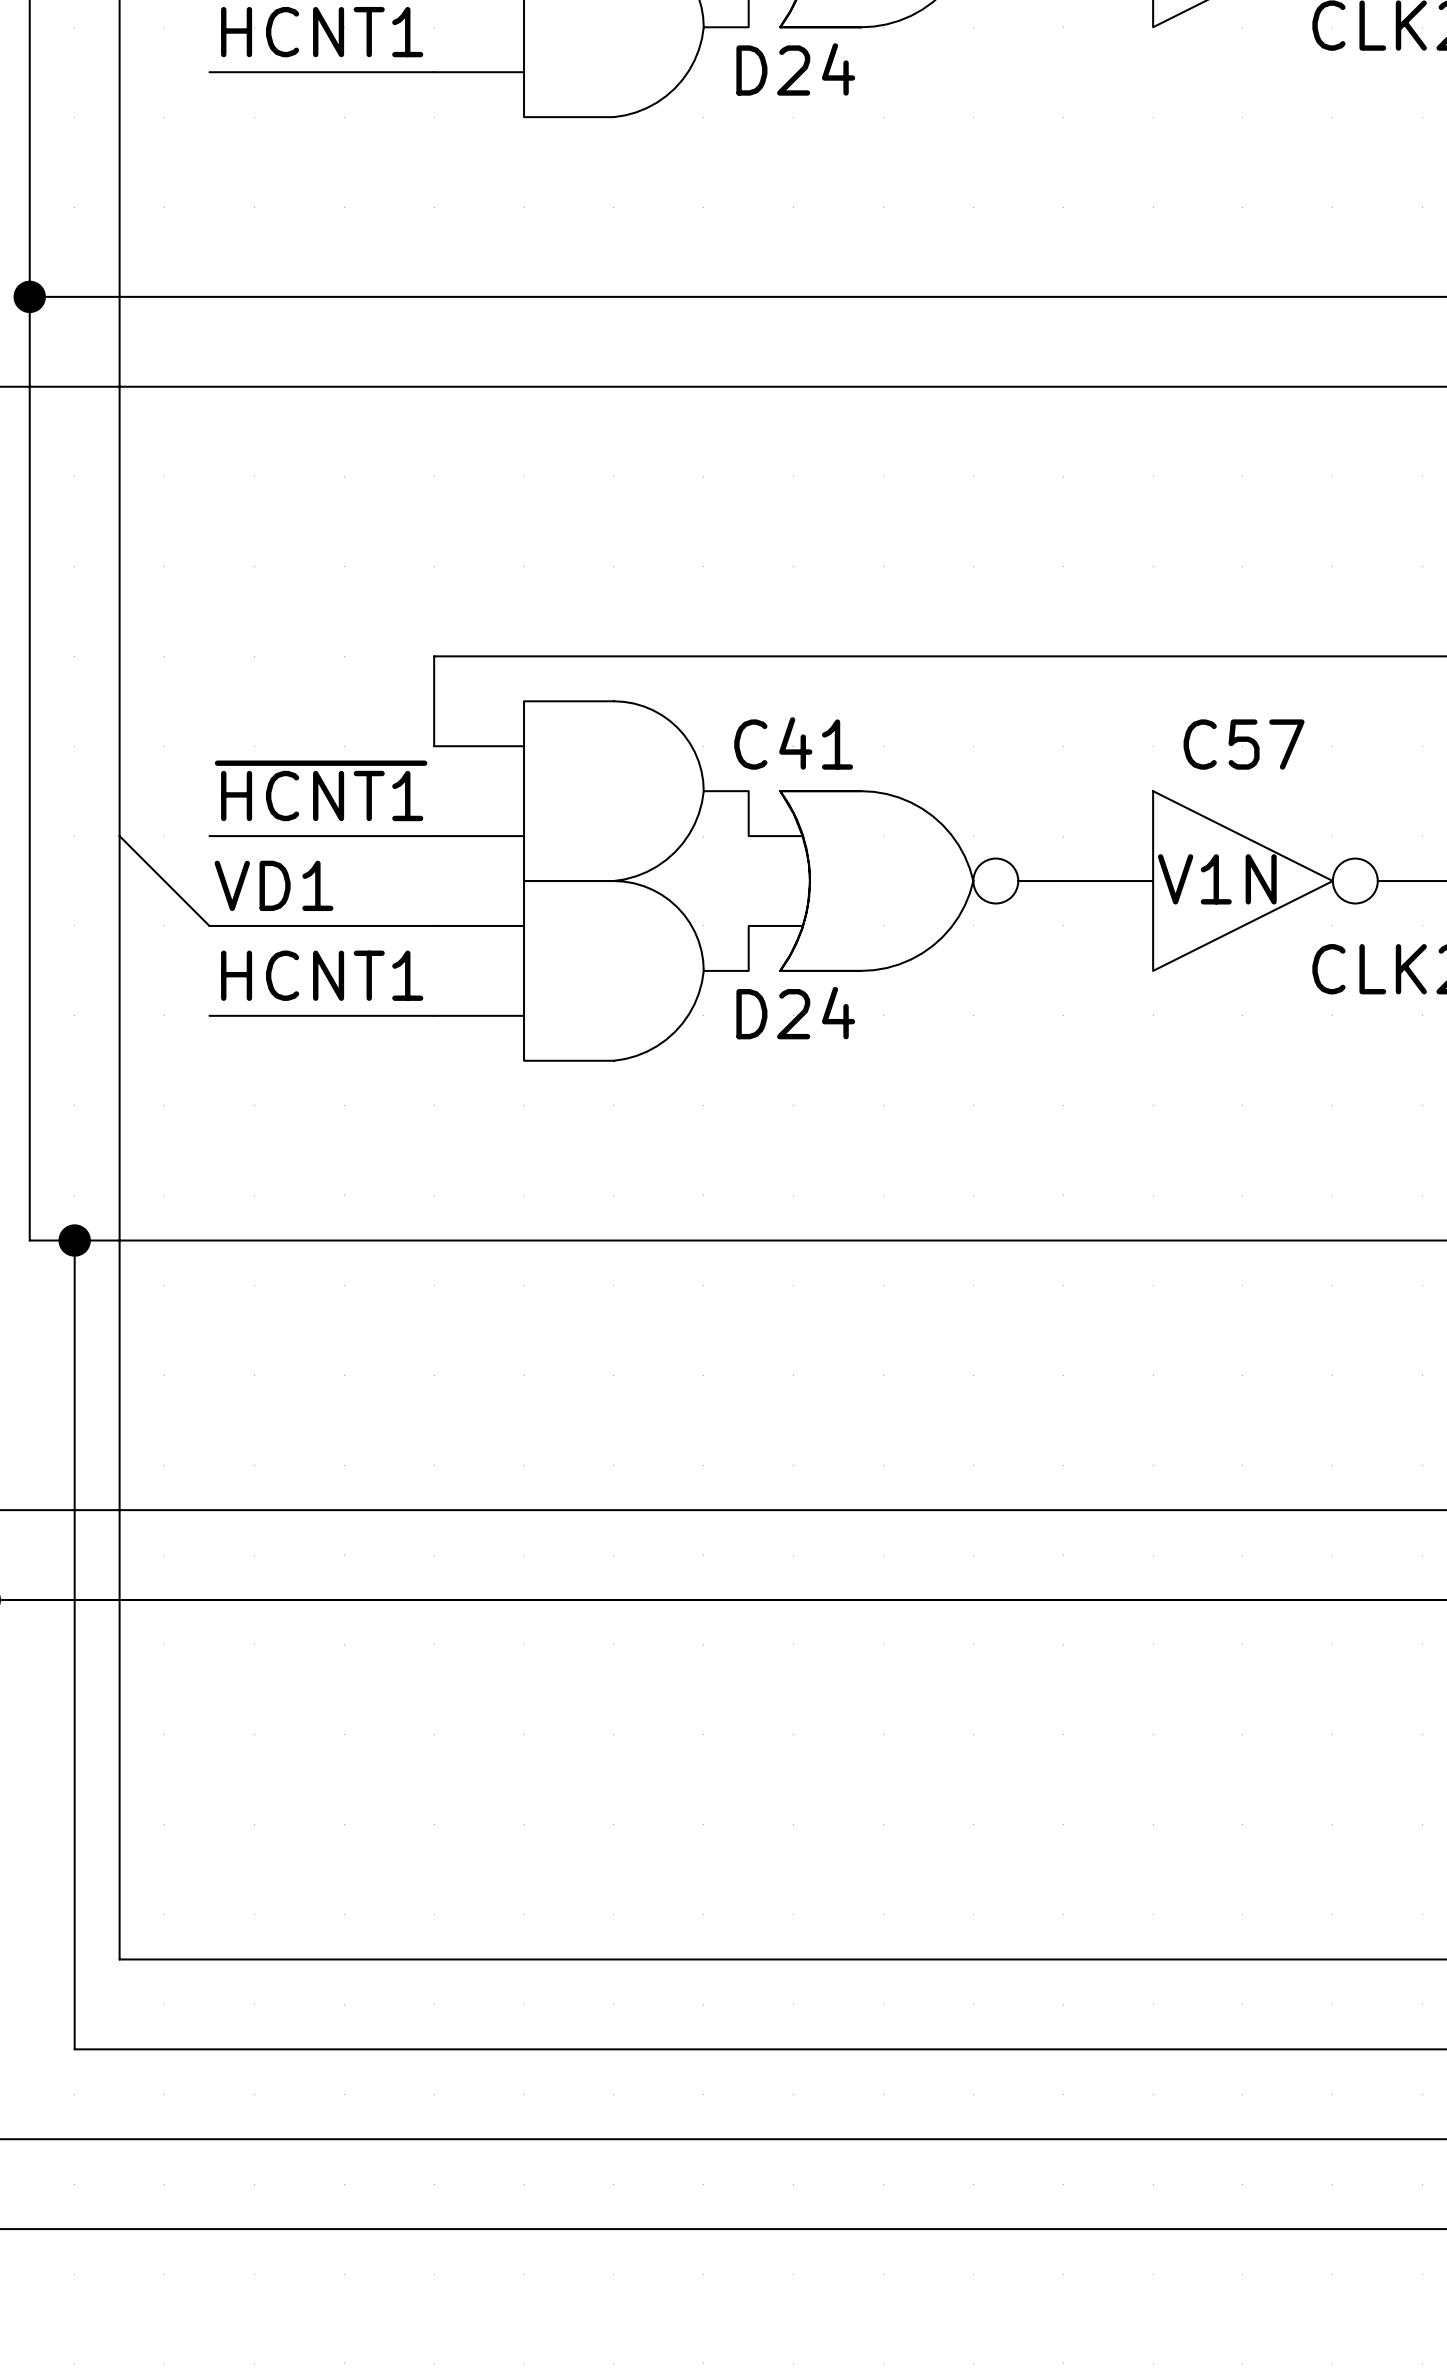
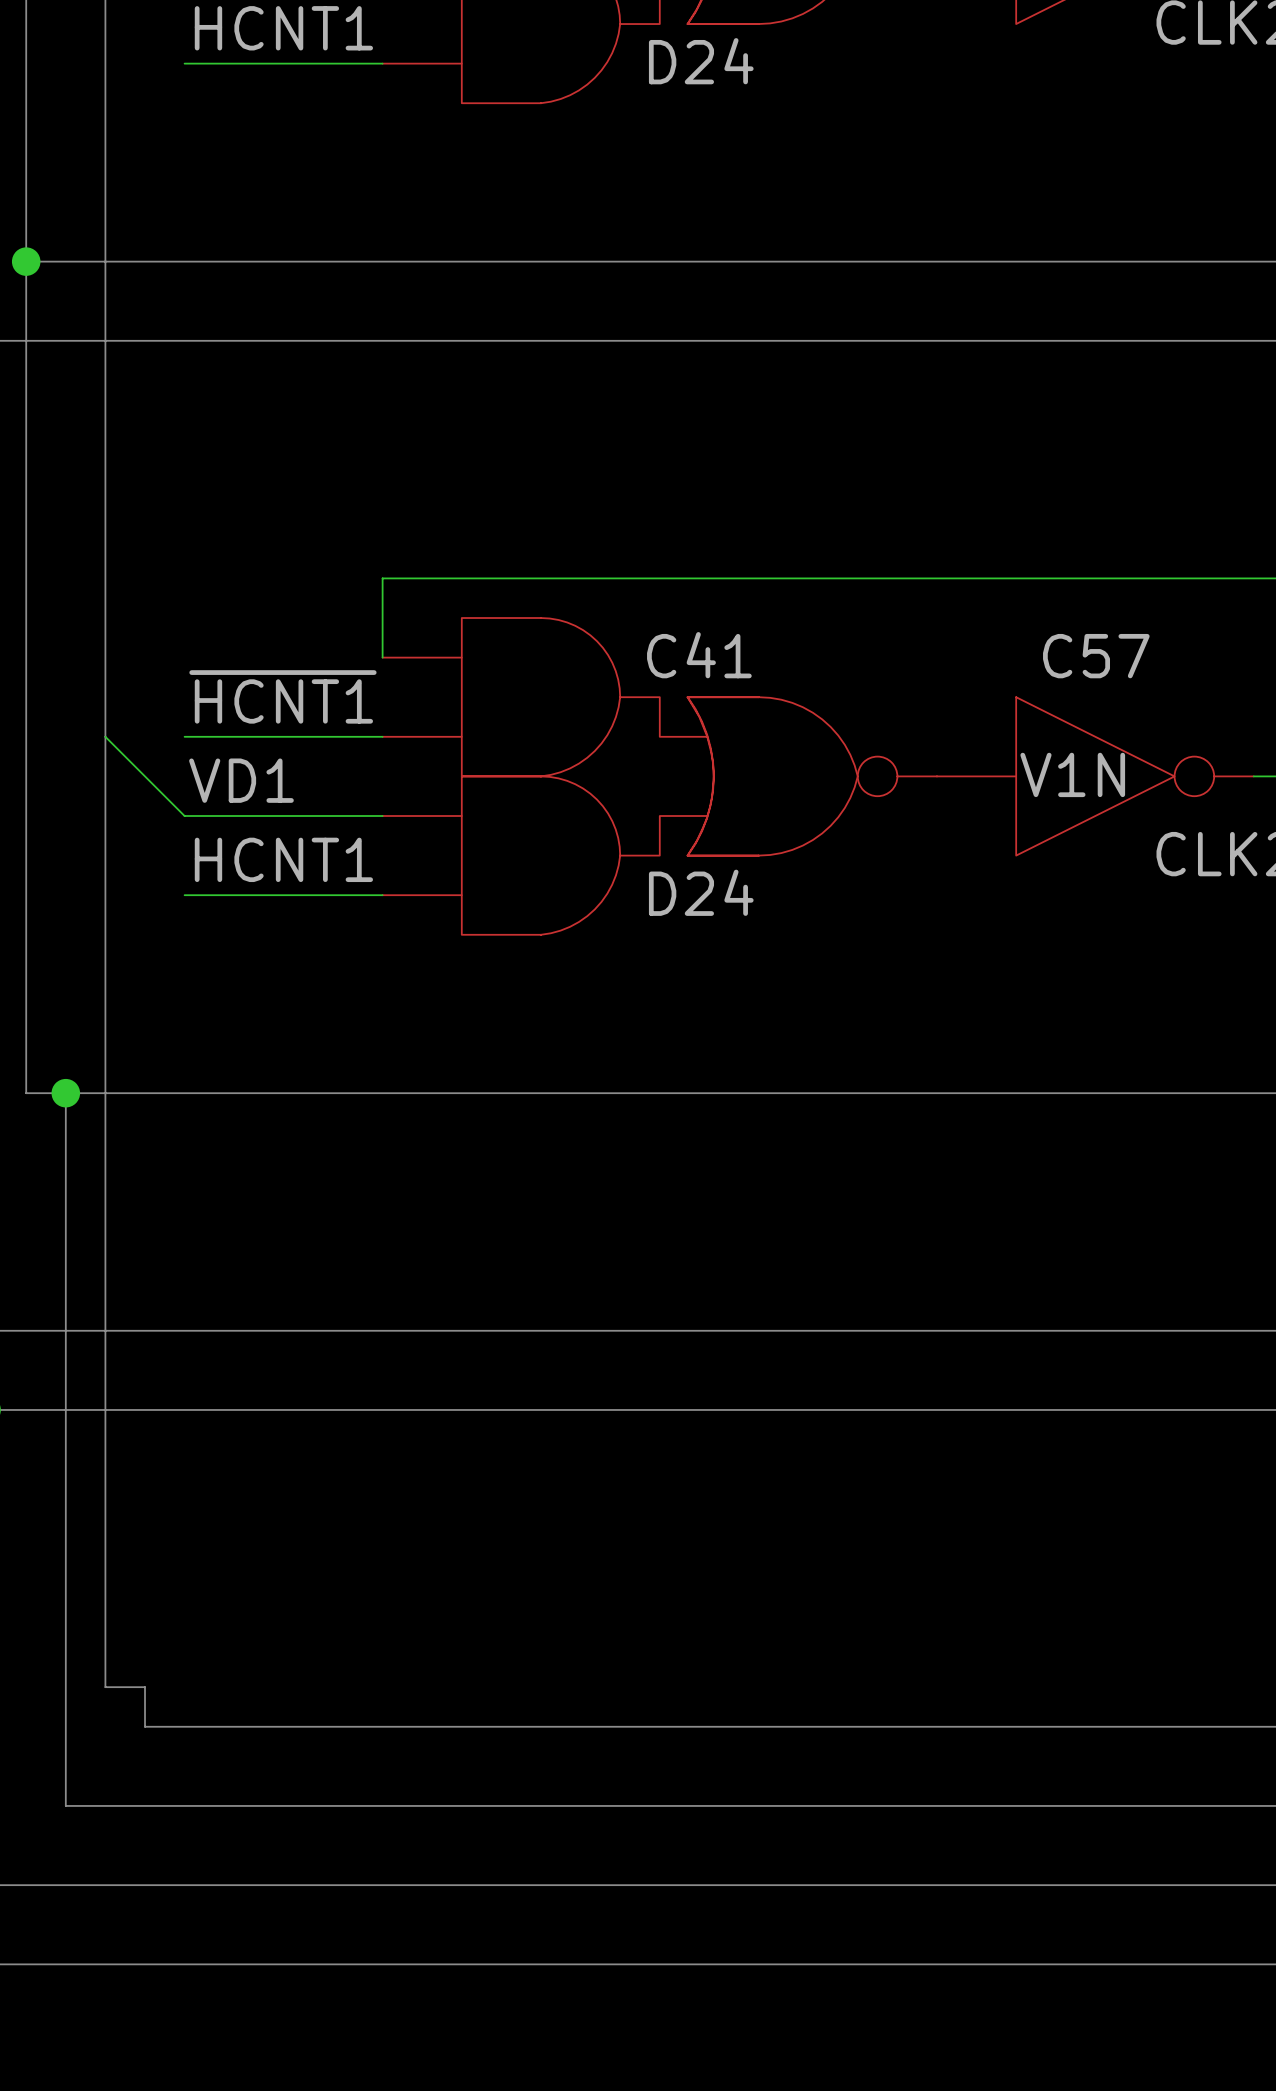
bus: (119, 1914) (119, 1959) (164, 1959) -> (105, 1687) (145, 1687) (145, 1726)

